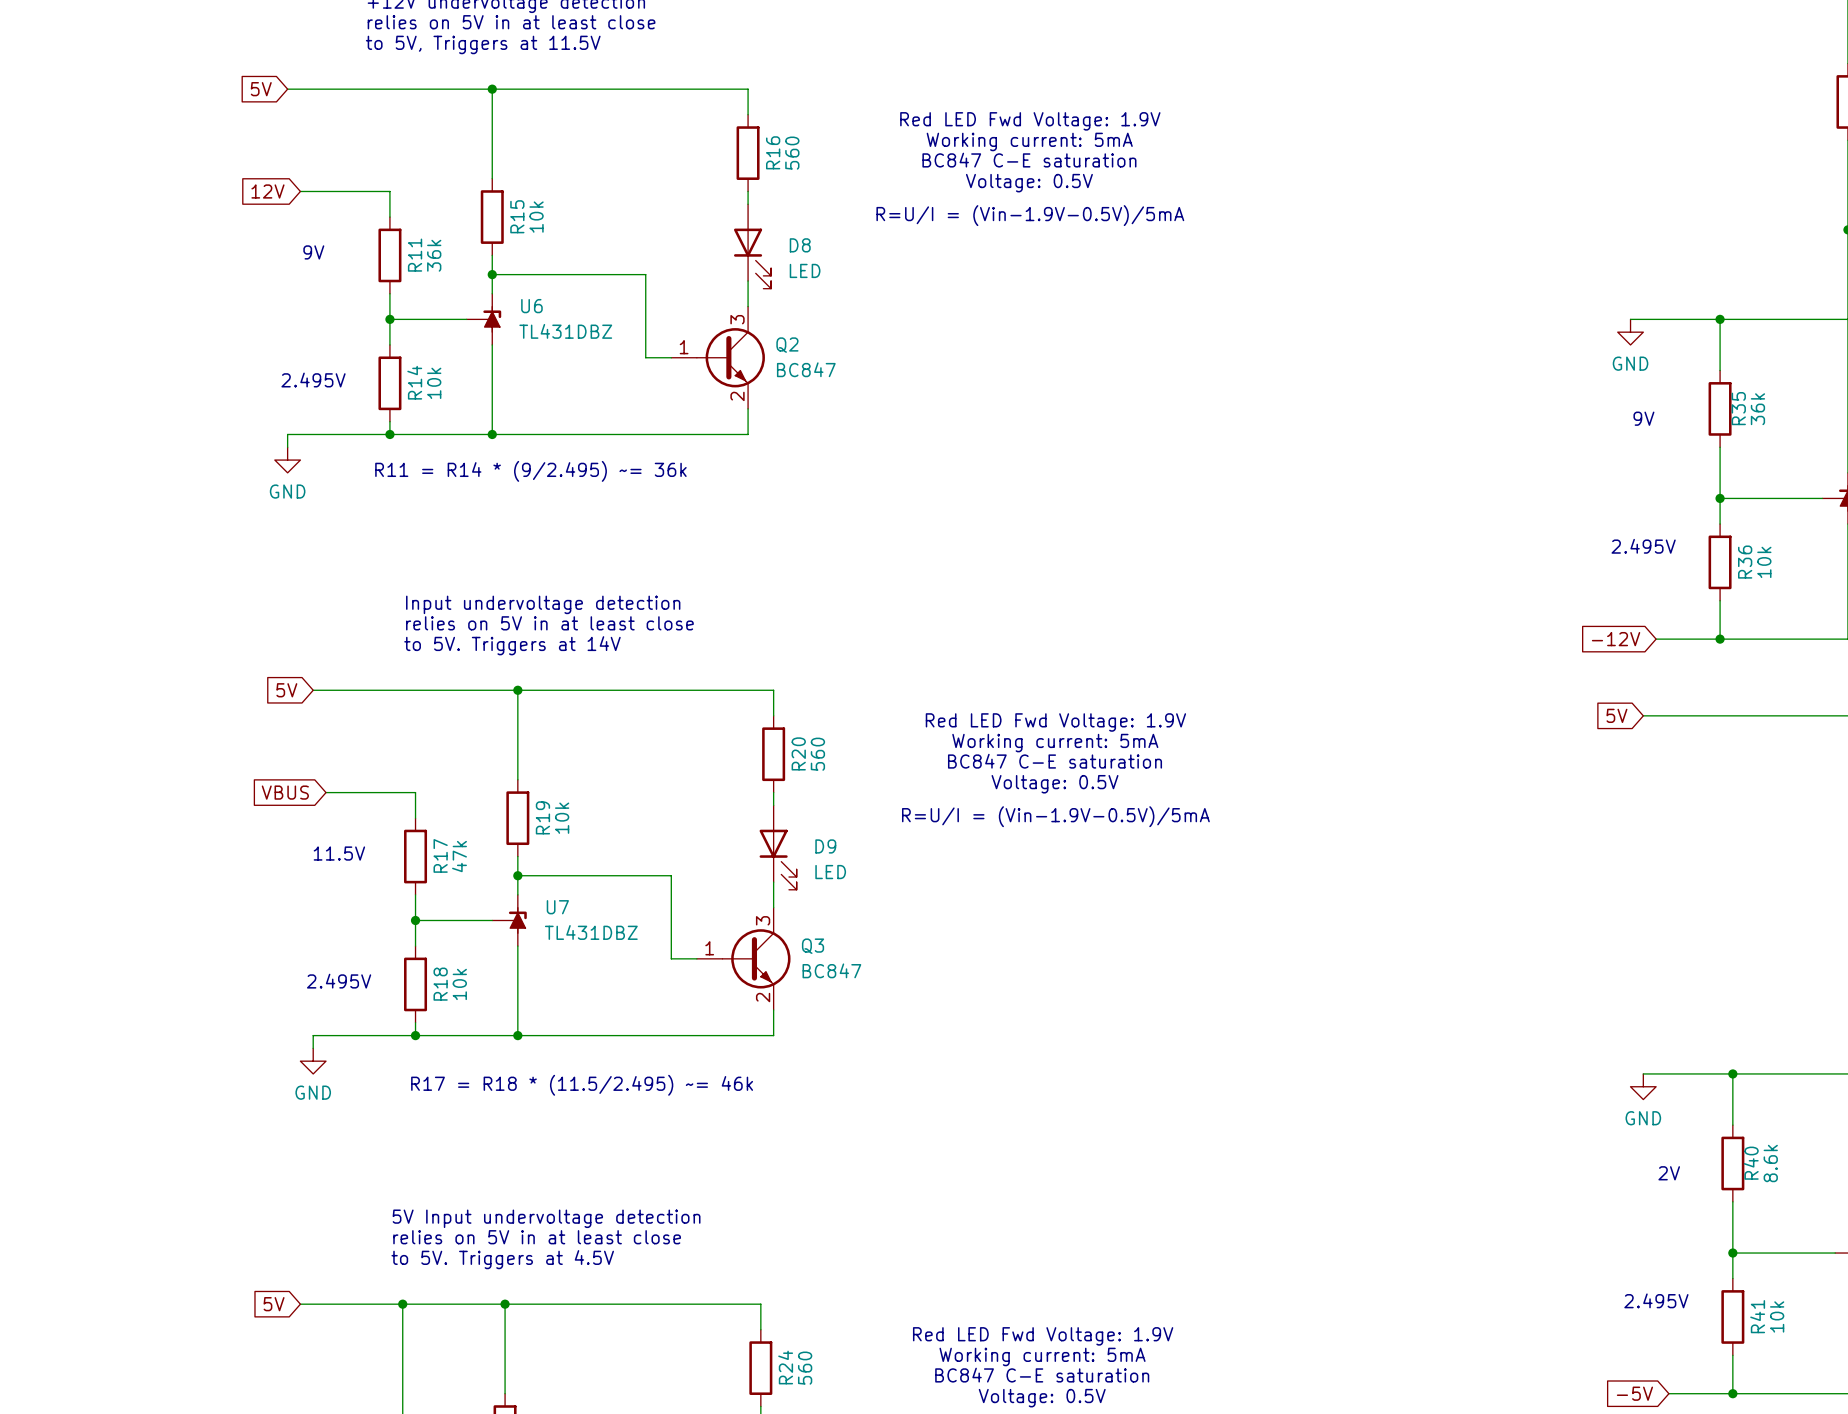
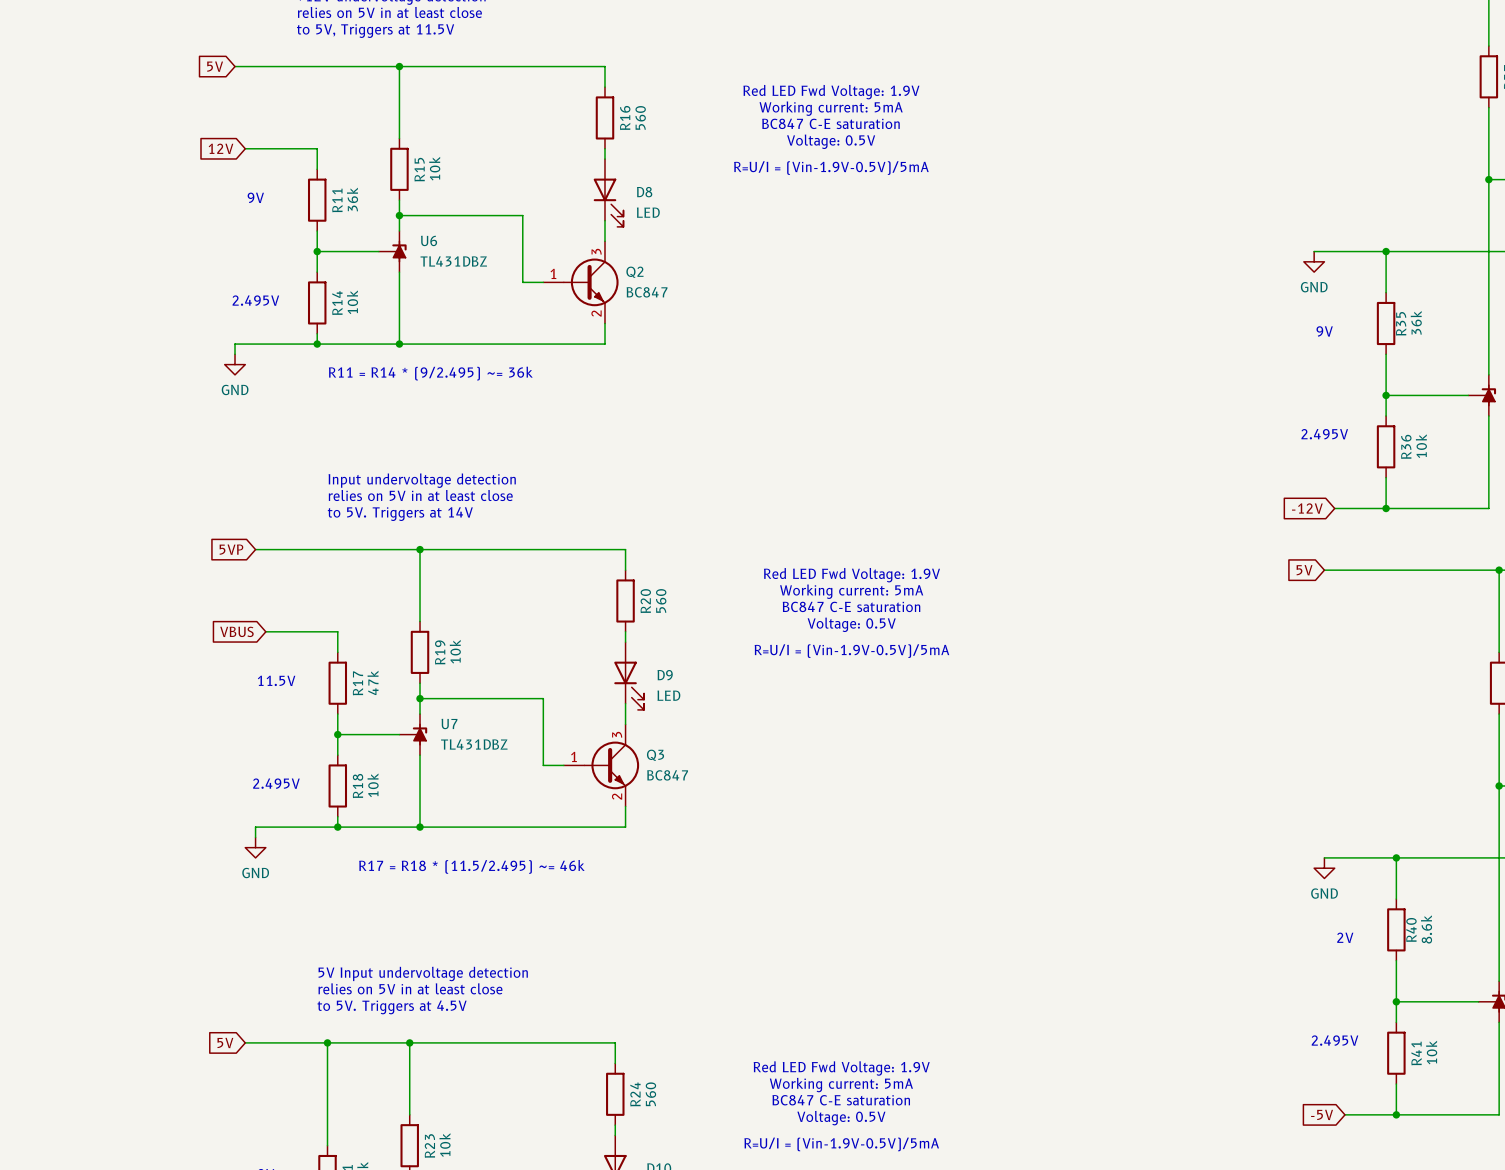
global label: 5V (286, 690) -> 5VP (231, 549)

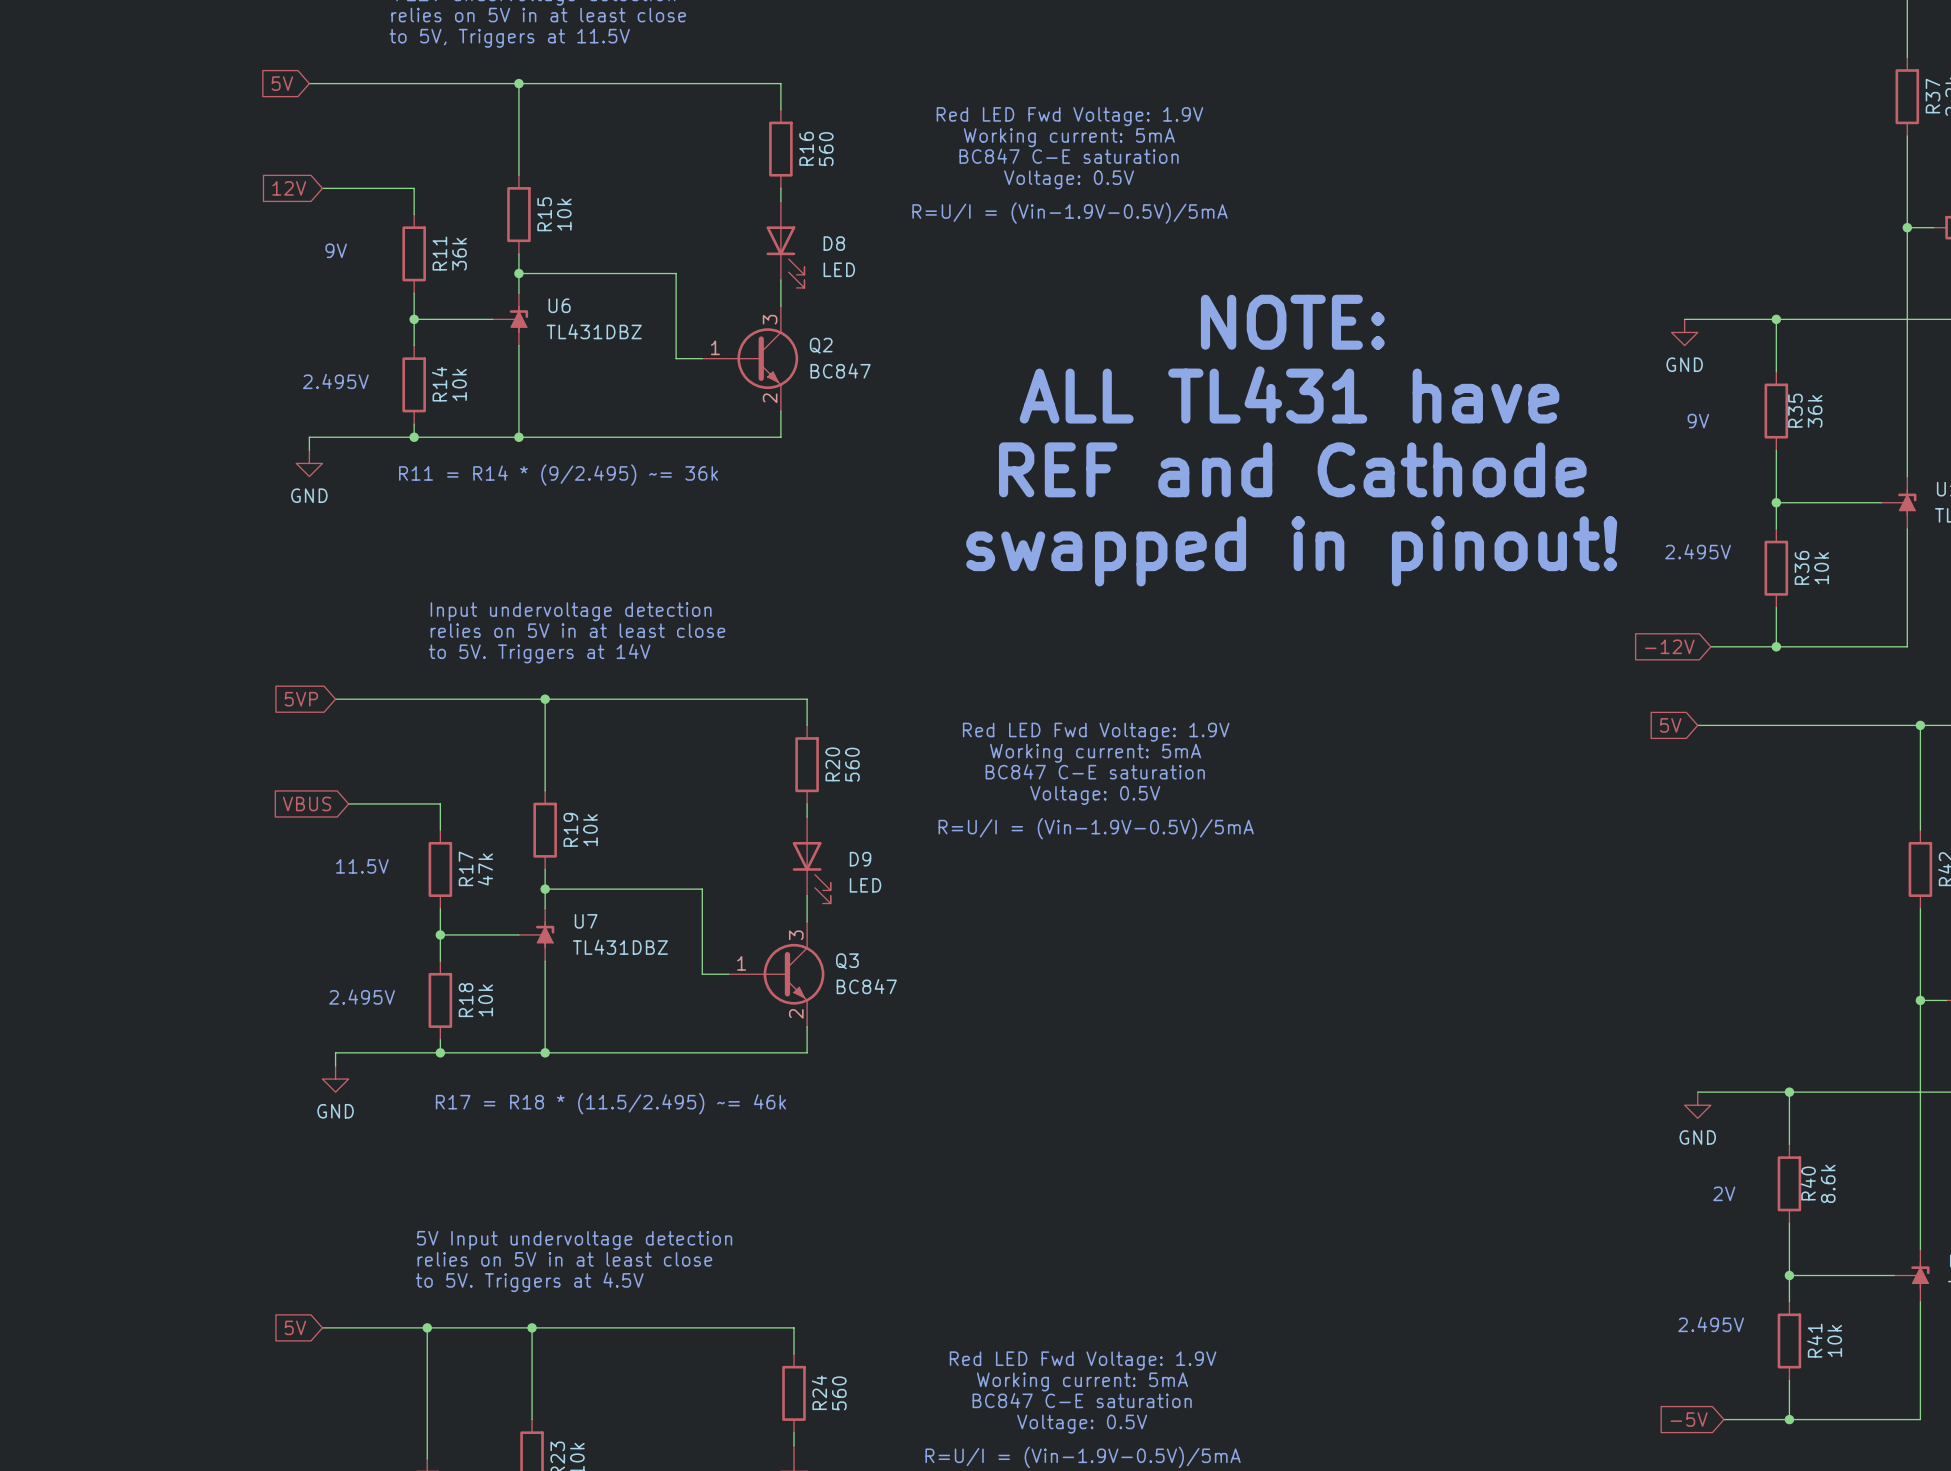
text: none -> NOTE: (1292, 322)
text: none -> ALL TL431 have (1289, 394)
text: none -> REF and Cathode (1292, 469)
text: none -> swapped in pinout! (1291, 551)

